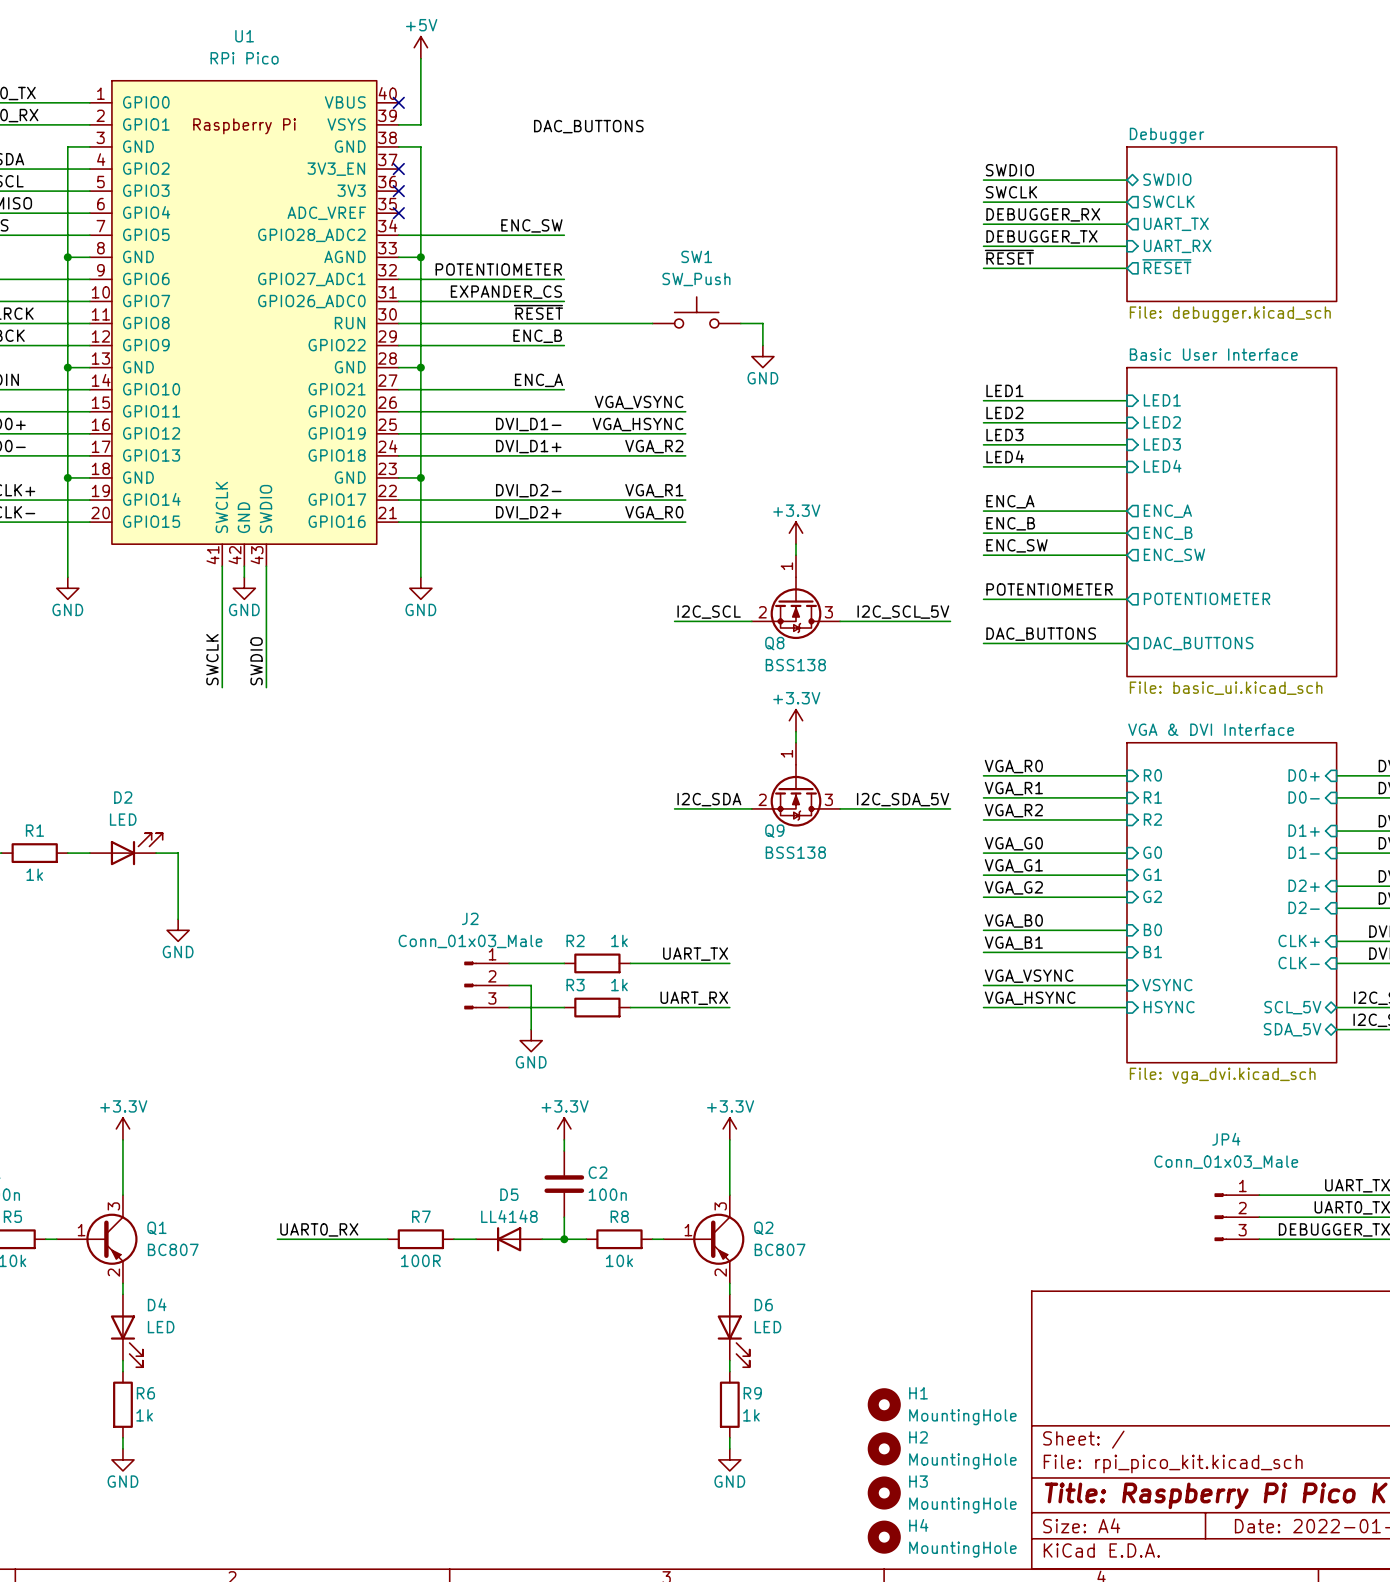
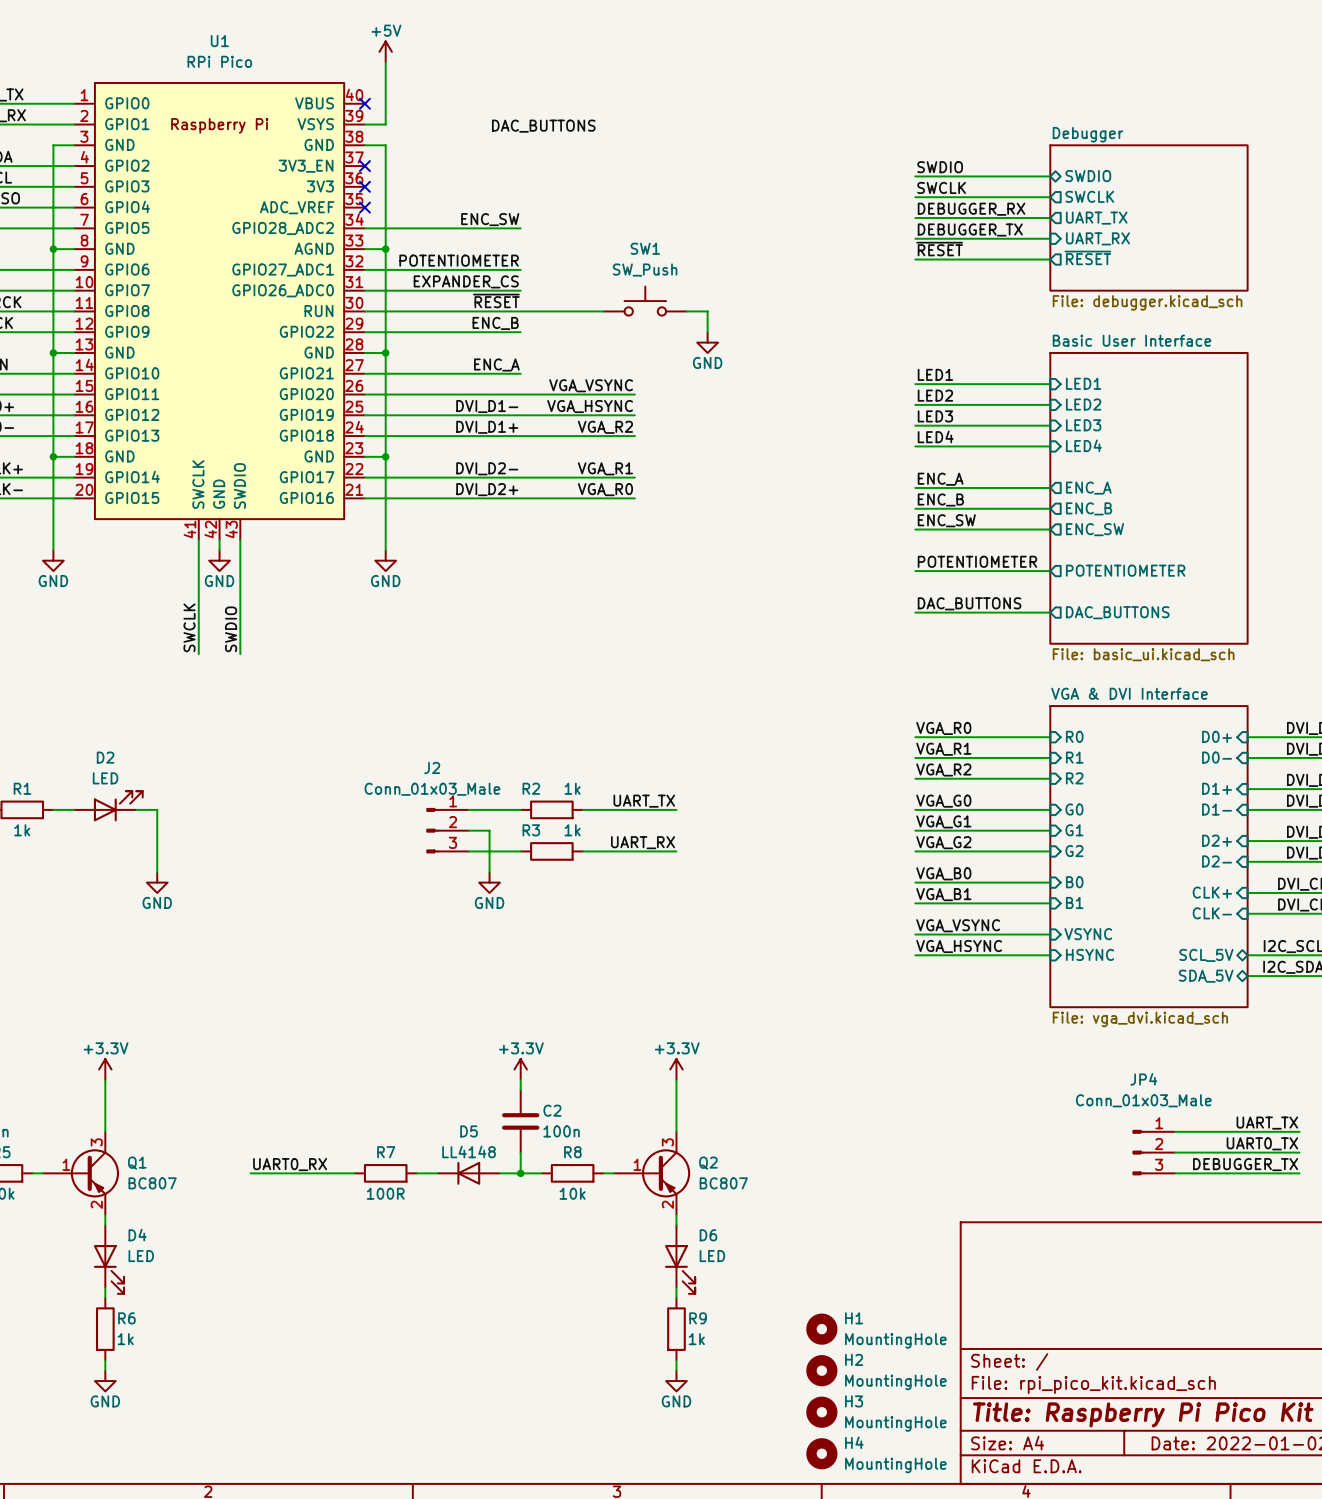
power symbol: +3.3V (795, 533) -> none
wire: (795, 544) (795, 555) -> none
Q8: BSS138 (795, 597) -> none
label: I2C_SCL (709, 612) -> none
label: I2C_SCL_5V (903, 612) -> none
wire: (674, 621) (751, 621) -> none
wire: (840, 621) (950, 621) -> none
power symbol: +3.3V (795, 720) -> none
wire: (795, 731) (795, 742) -> none
Q9: BSS138 (795, 784) -> none
label: I2C_SDA (709, 799) -> none
label: I2C_SDA_5V (903, 799) -> none
wire: (674, 808) (751, 808) -> none
wire: (840, 808) (950, 808) -> none
label position: UART_TX (695, 954) -> UART_TX (644, 801)
wire: (509, 963) (564, 963) -> (468, 809) (520, 809)
R2 position: (597, 963) -> (551, 809)
wire: (630, 963) (729, 963) -> (583, 809) (676, 809)
J2 position: (486, 985) -> (447, 830)
wire: (509, 985) (531, 985) (531, 1029) -> (468, 830) (489, 830) (489, 872)
label position: UART_RX (694, 998) -> UART_RX (643, 842)
wire: (509, 1007) (564, 1007) -> (468, 851) (520, 851)
R3 position: (597, 1007) -> (551, 851)
wire: (630, 1007) (729, 1007) -> (583, 851) (676, 851)
power symbol position: GND (531, 1040) -> GND (489, 882)

